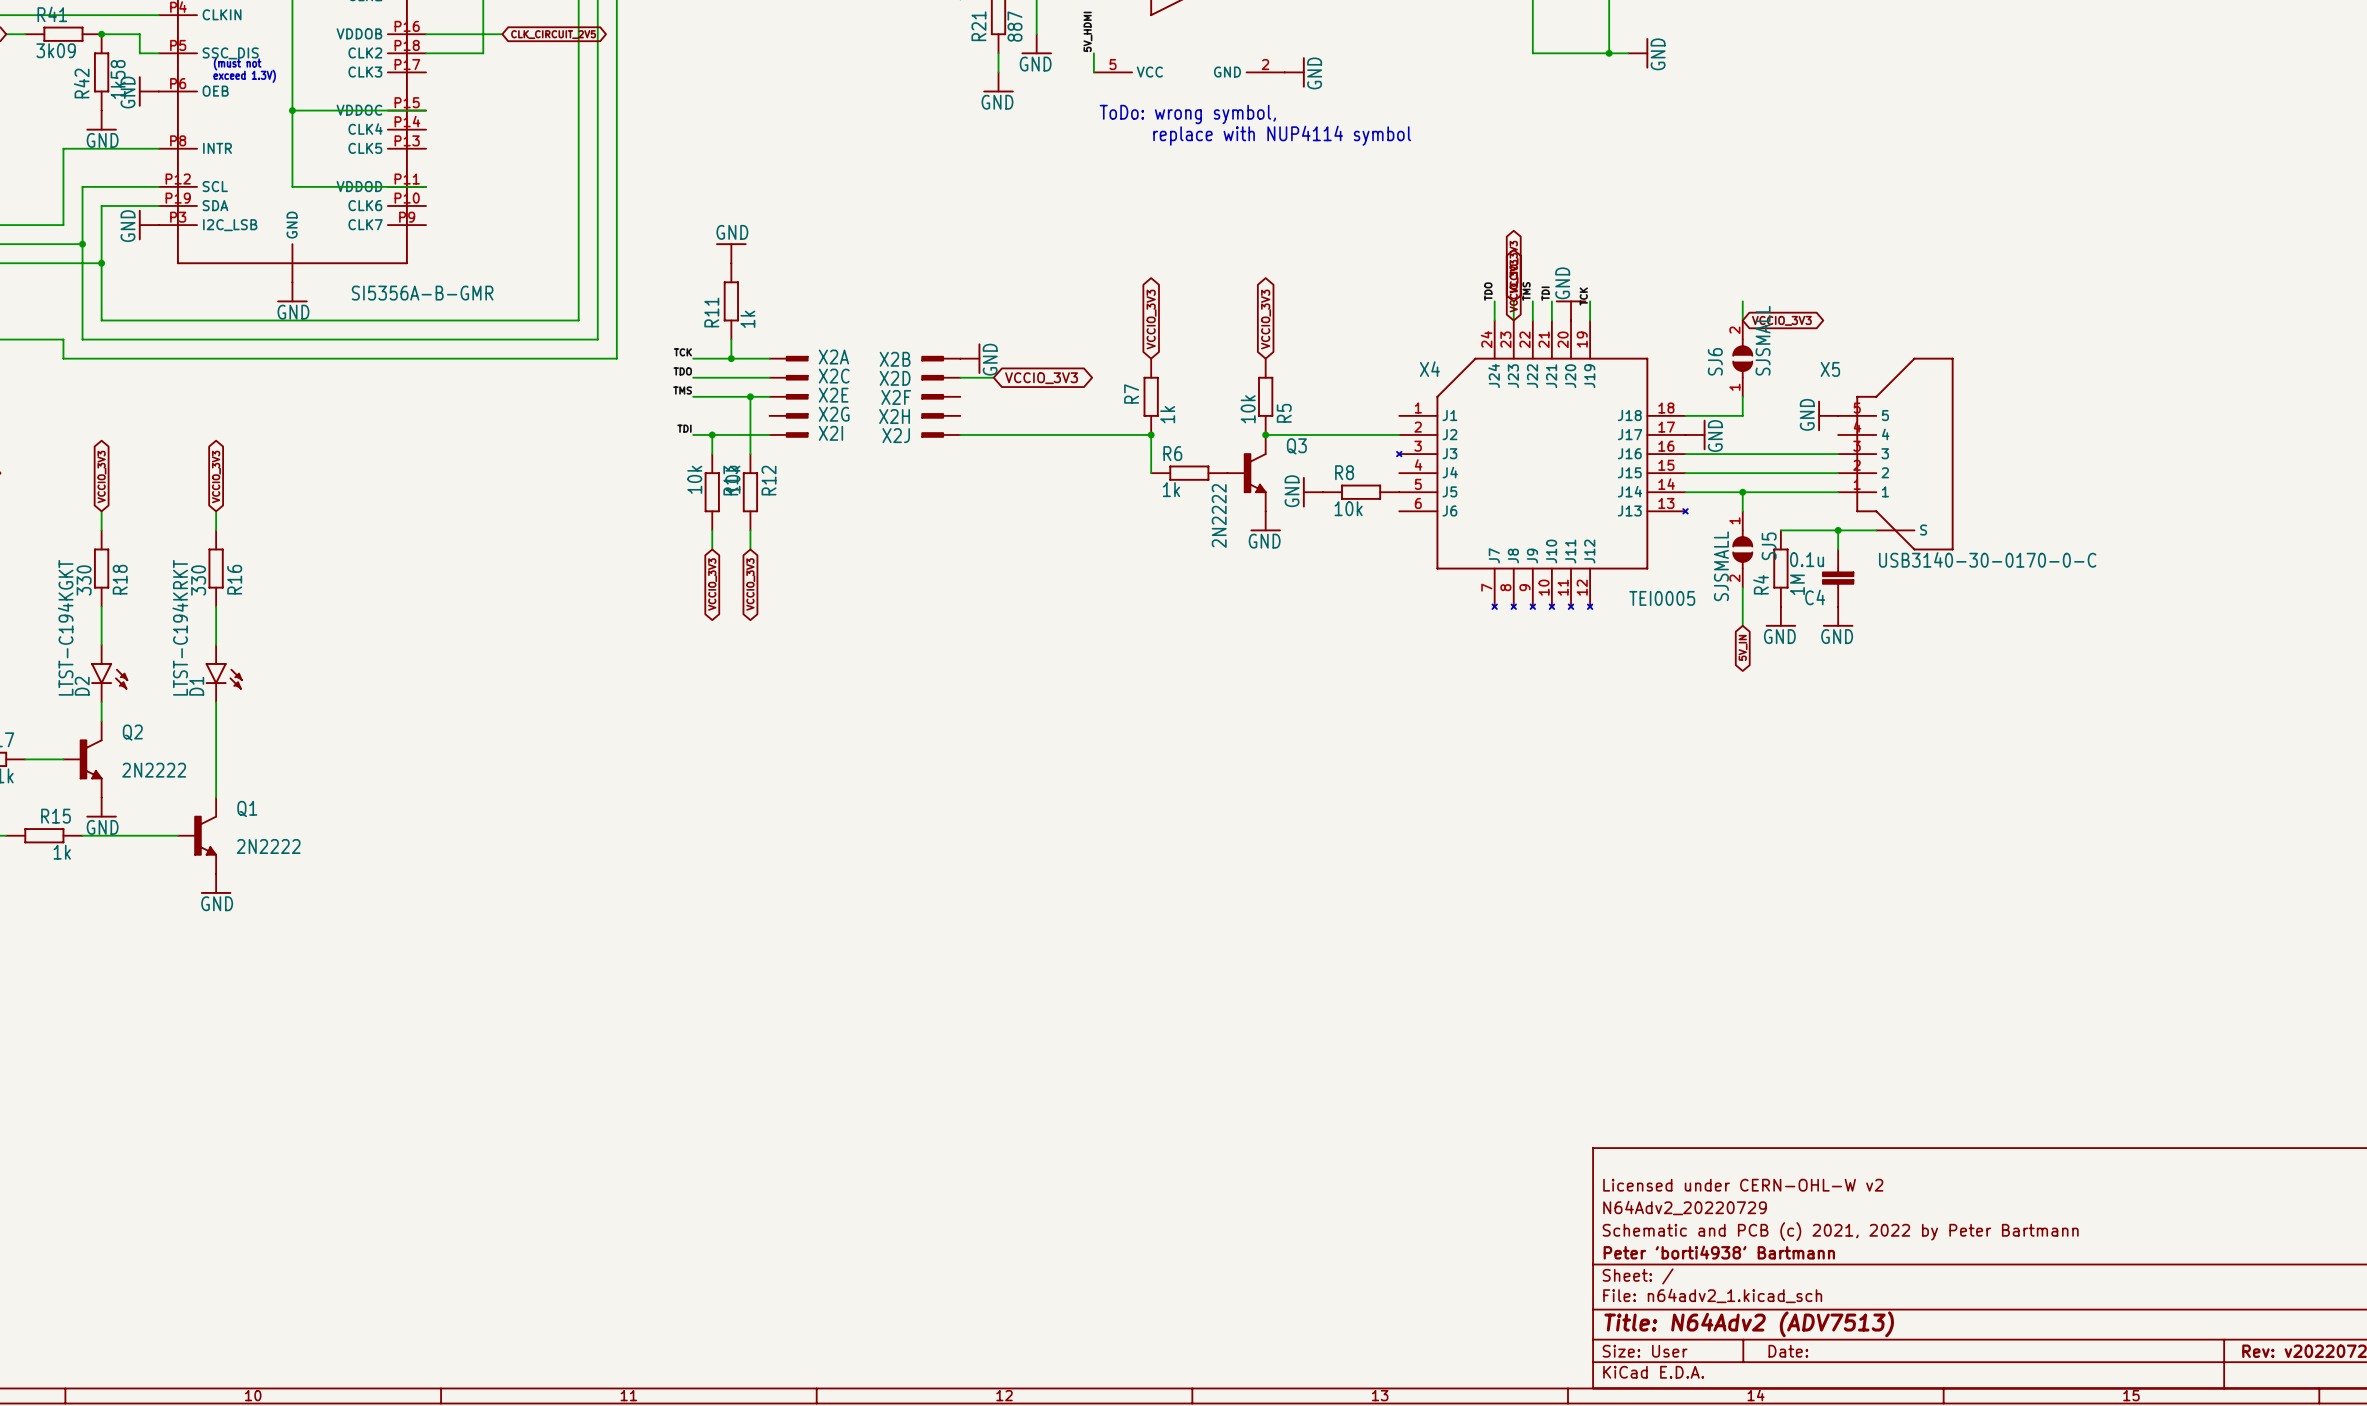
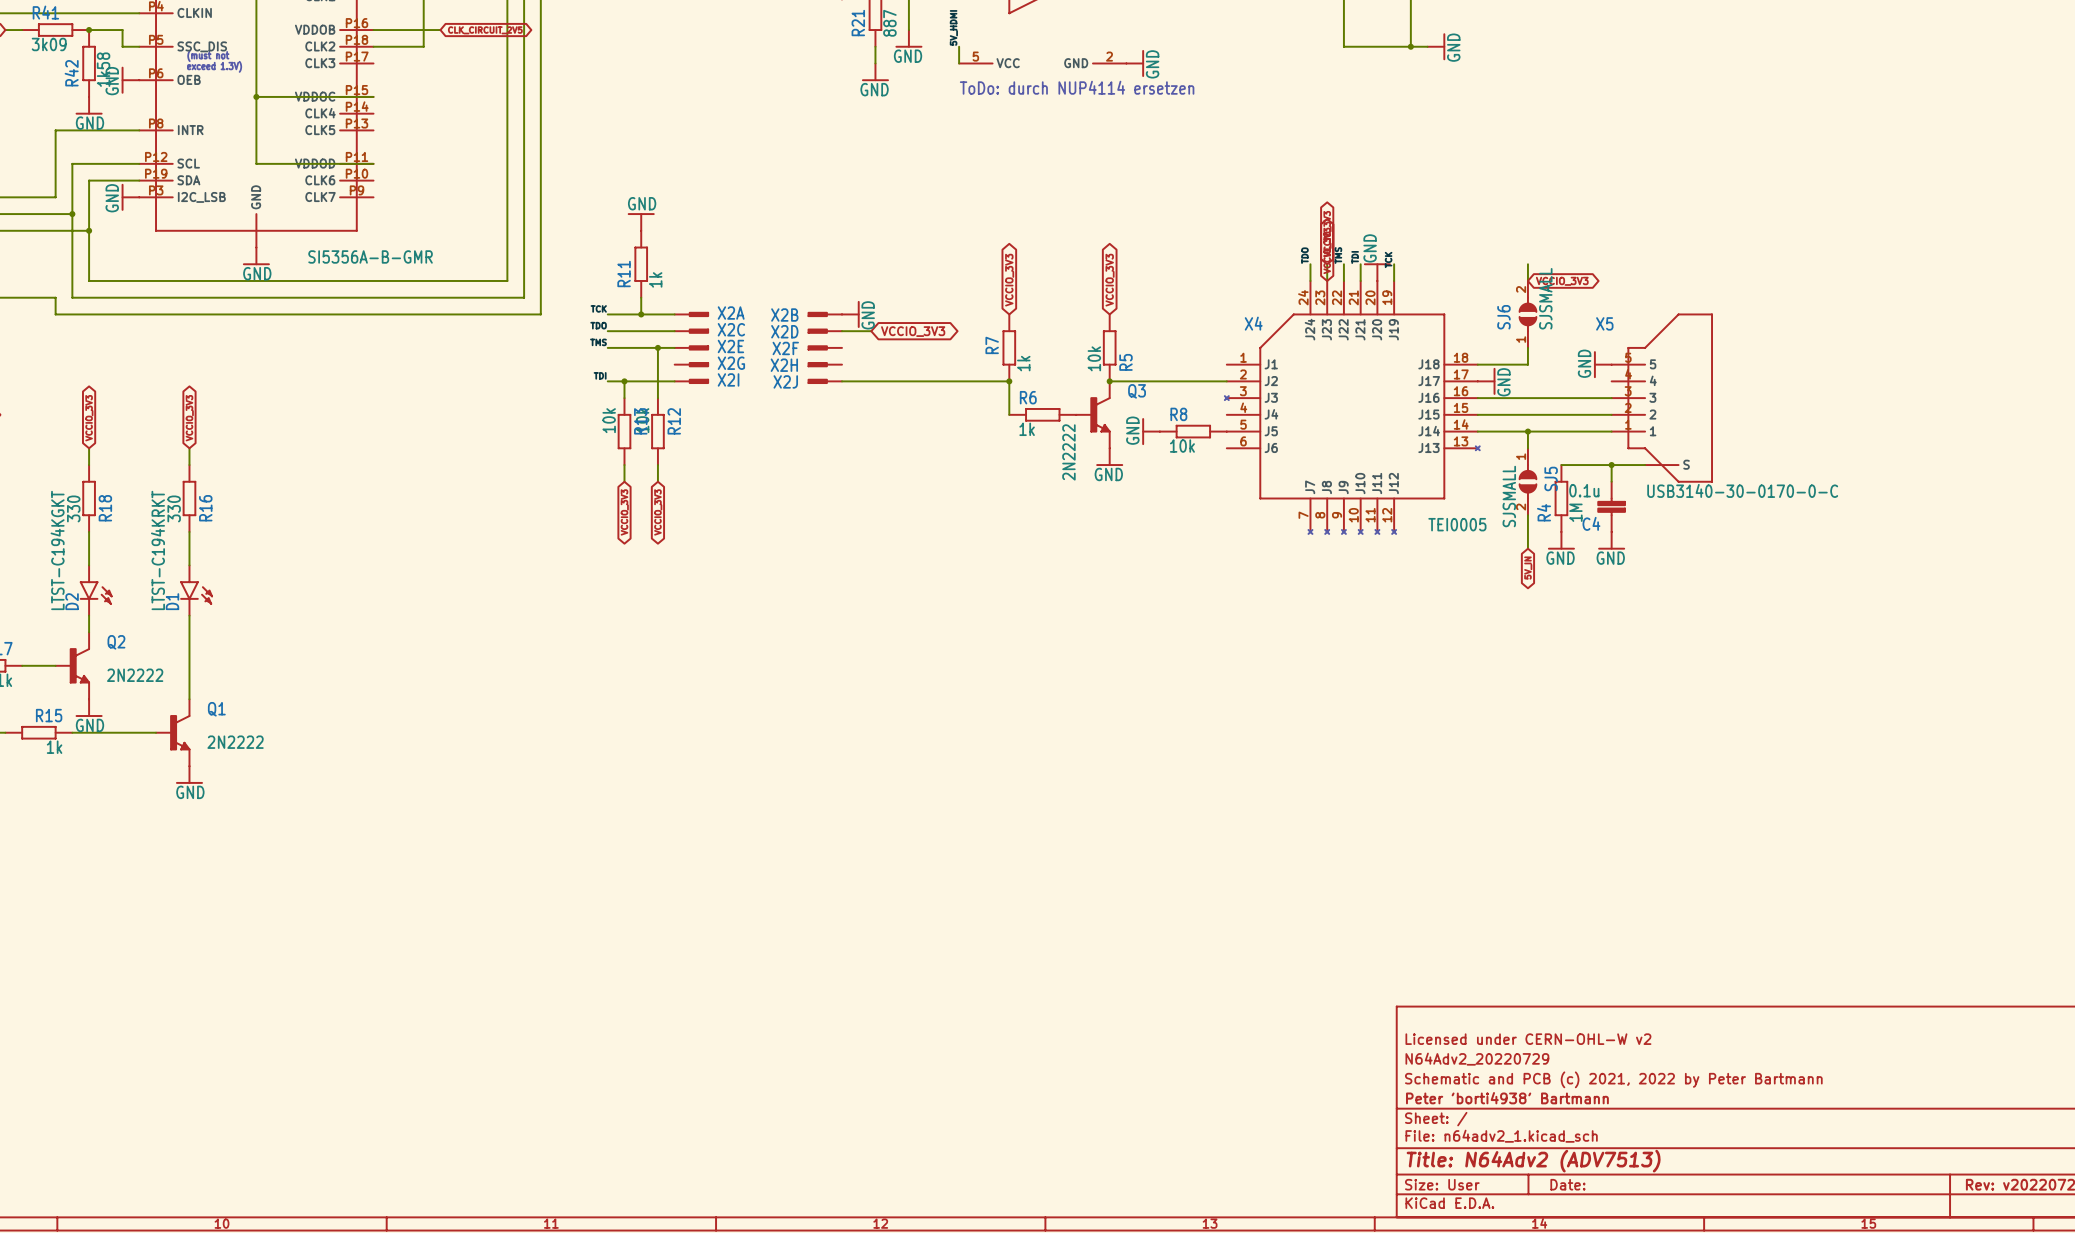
text: none -> ToDo: durch NUP4114 ersetzen (1077, 87)
text: ToDo: wrong symbol, (1187, 114) -> none
text: replace with NUP4114 symbol (1282, 135) -> none

